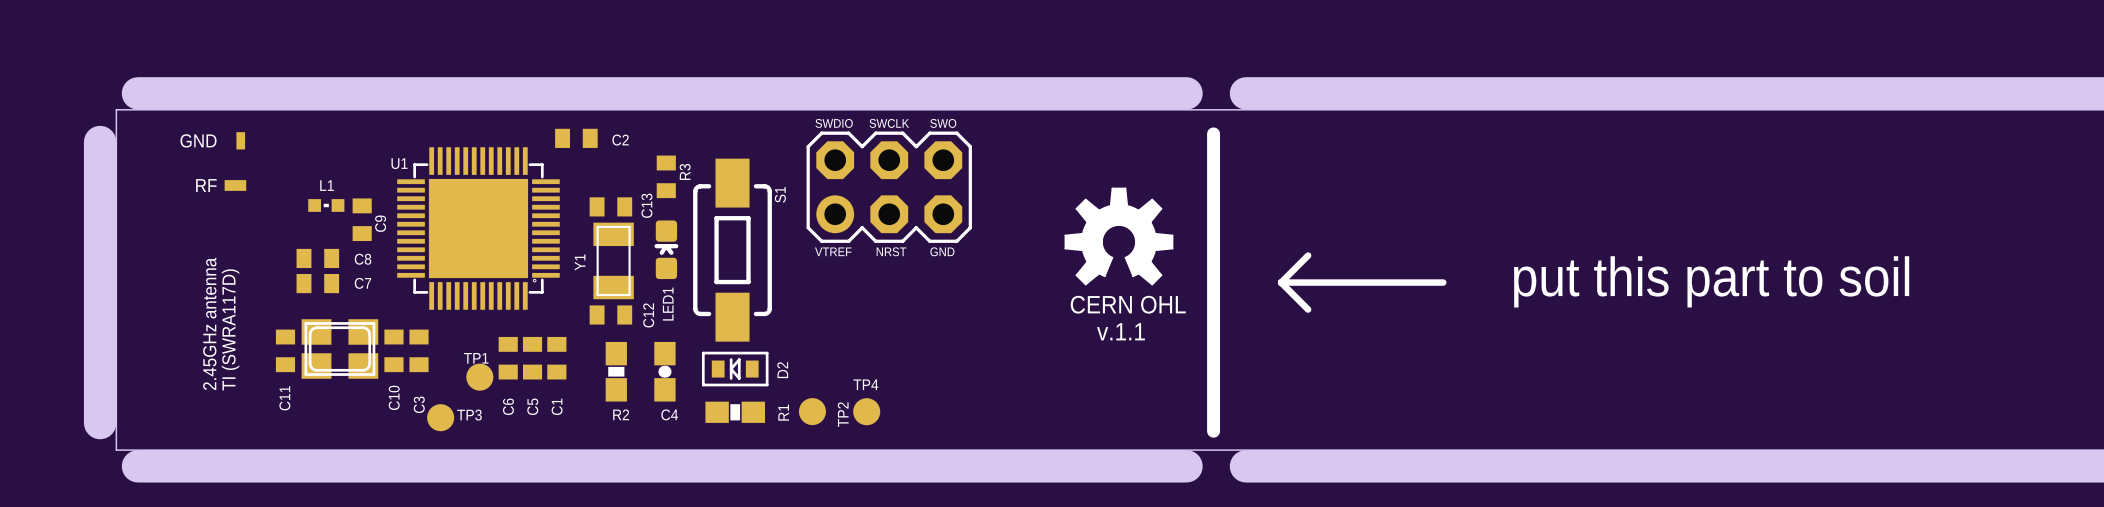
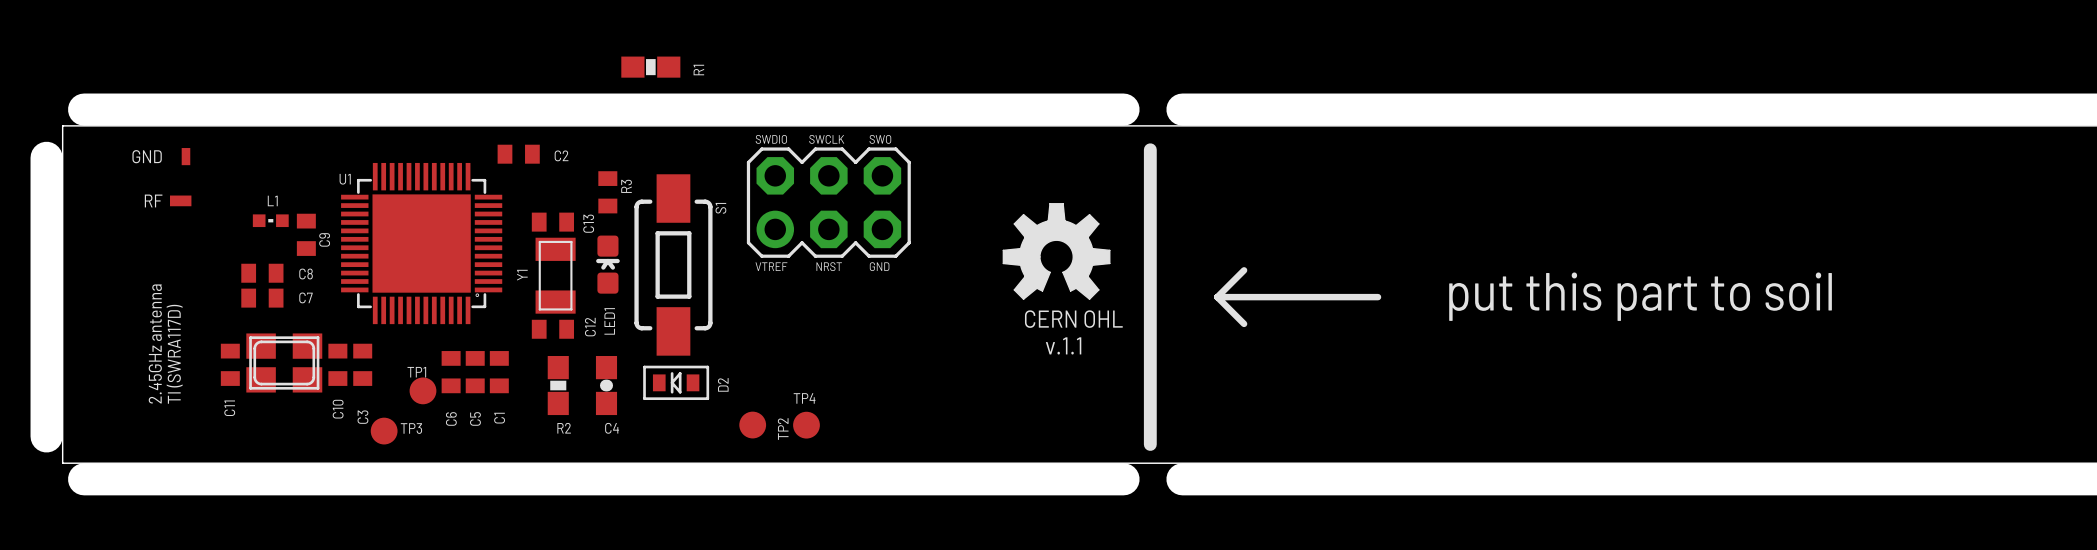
R1 position: (735, 412) -> (650, 67)

